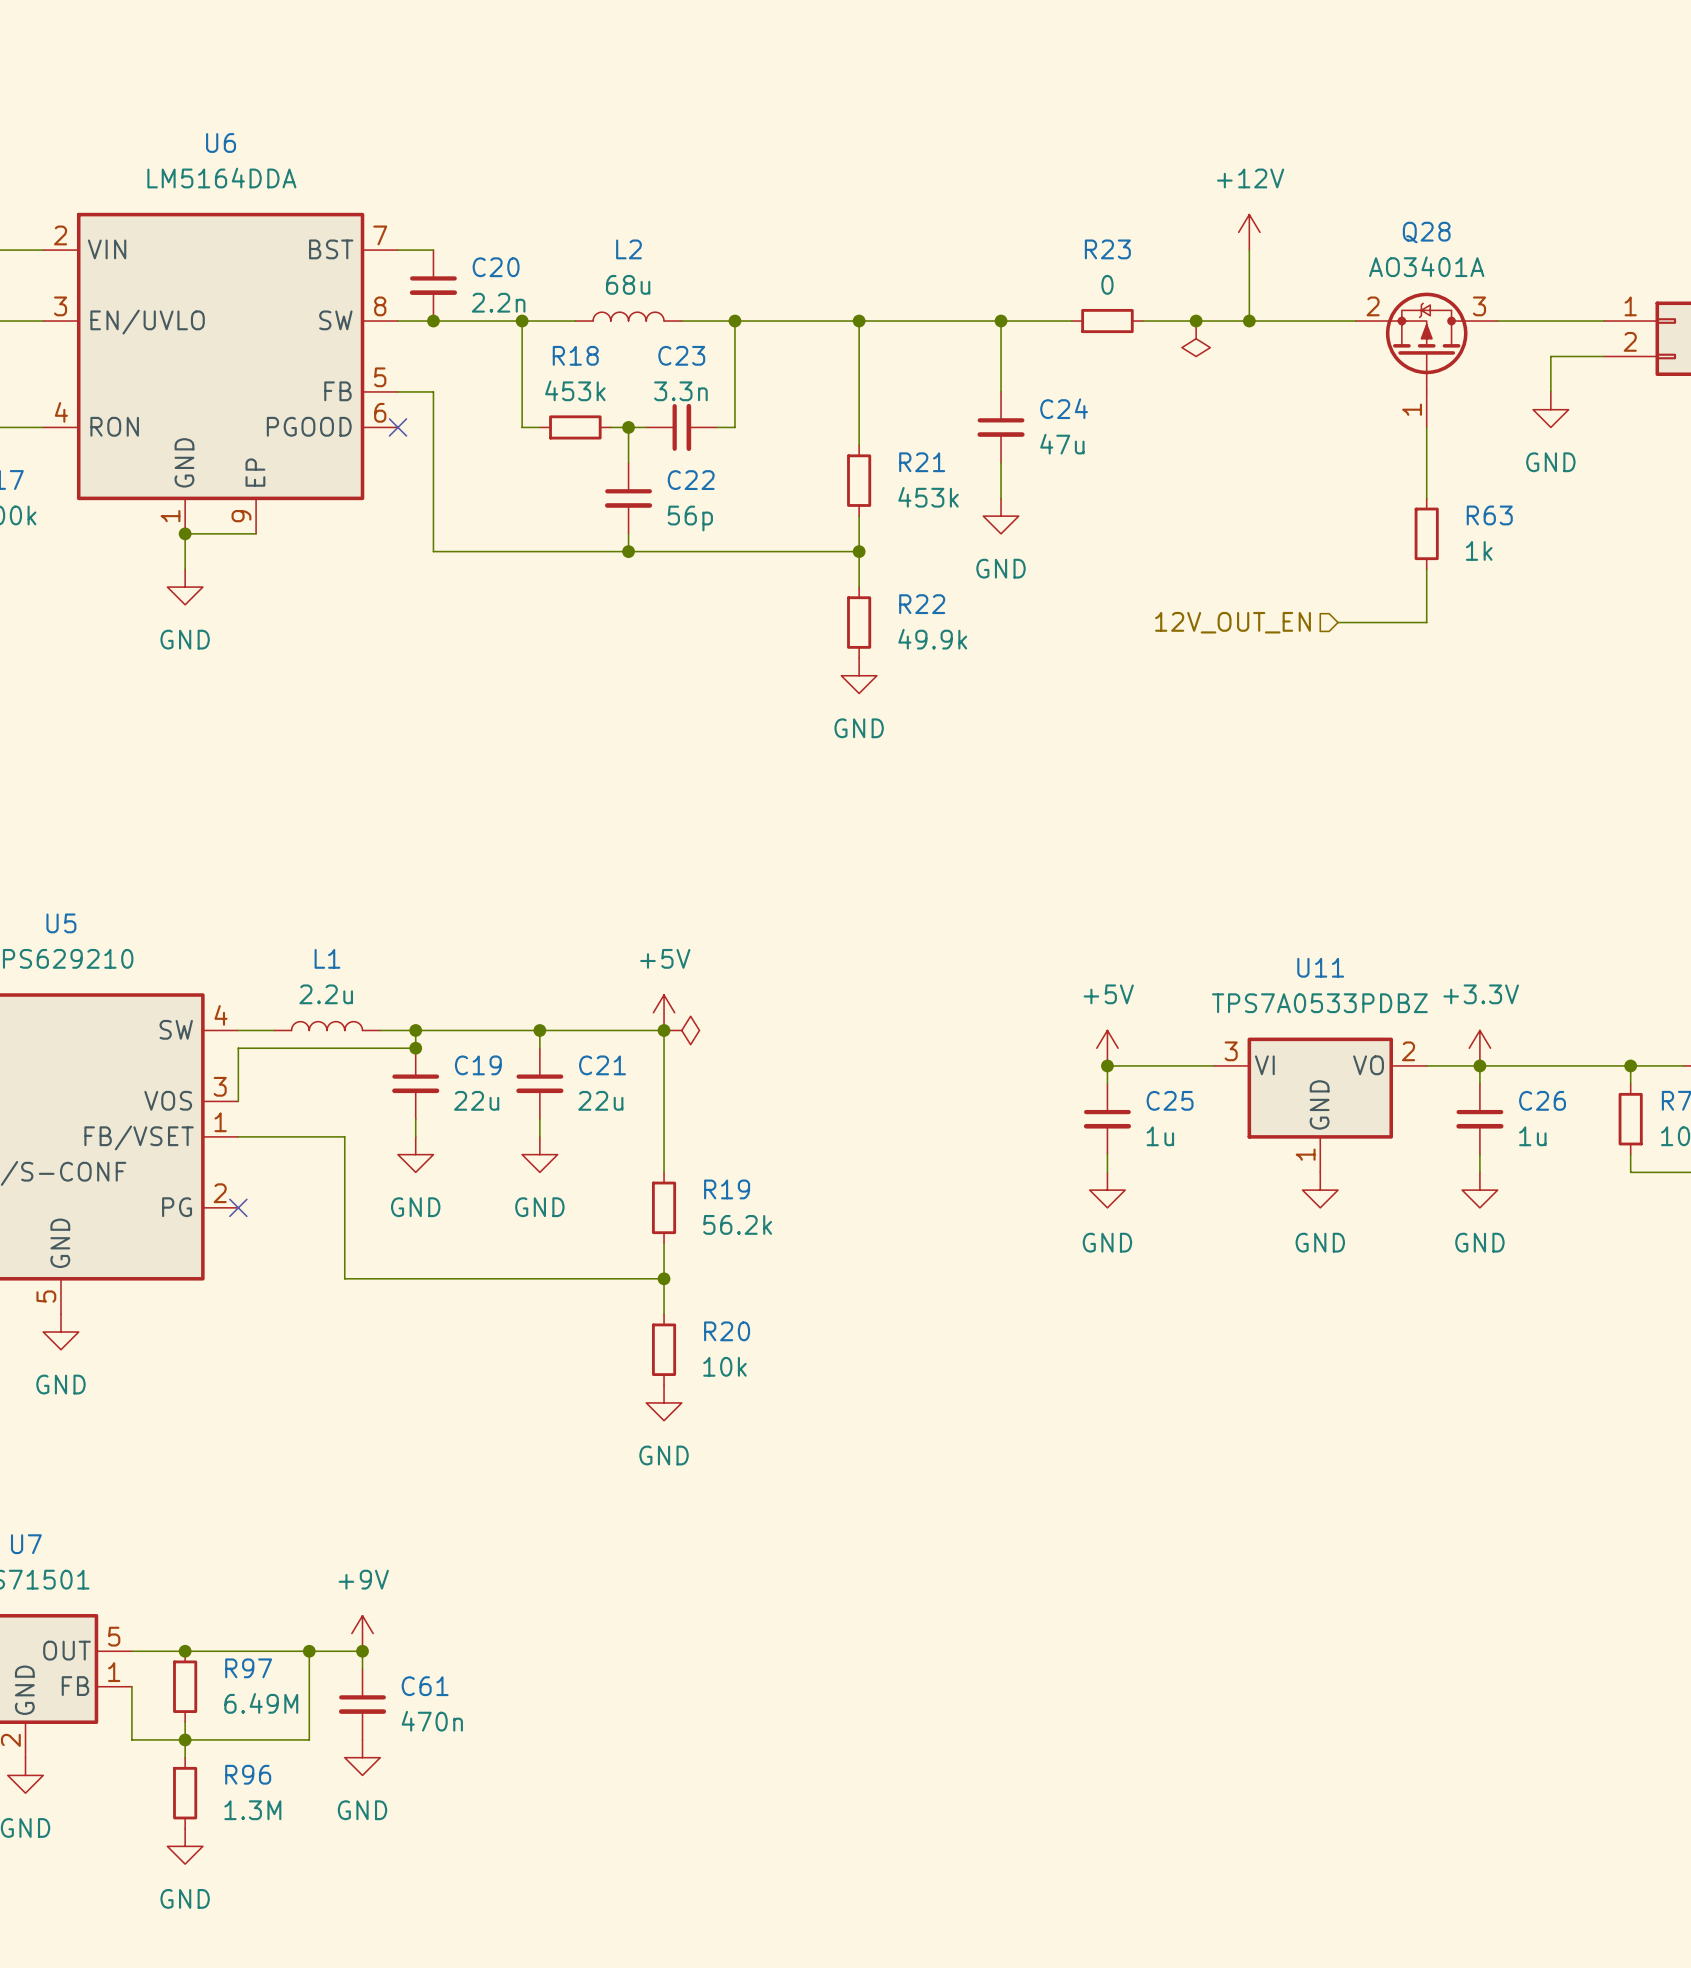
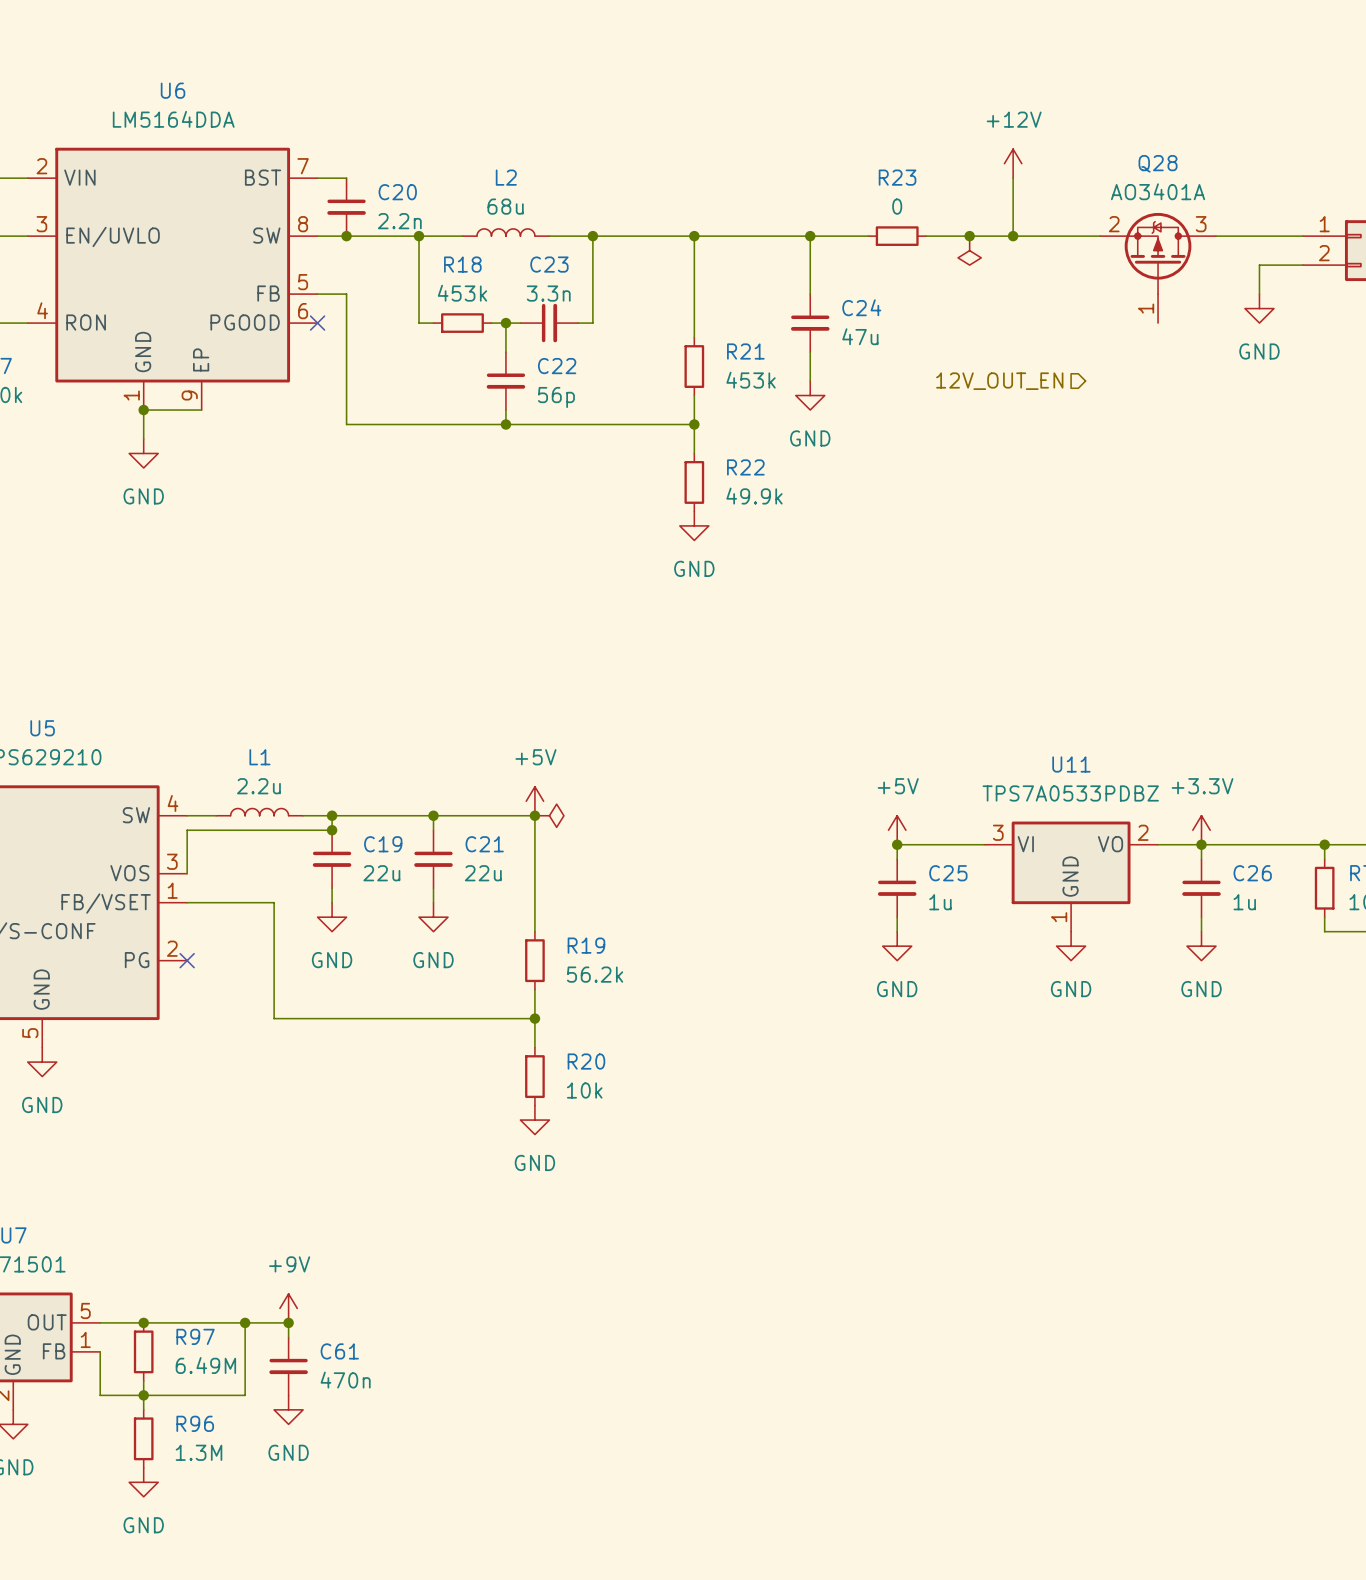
wire: (1426, 427) (1426, 498) -> none
R63: 1k (1426, 533) -> none
wire: (1426, 569) (1426, 622) (1338, 622) -> none
hierarchical label position: 12V_OUT_EN (1233, 622) -> 12V_OUT_EN (999, 381)

